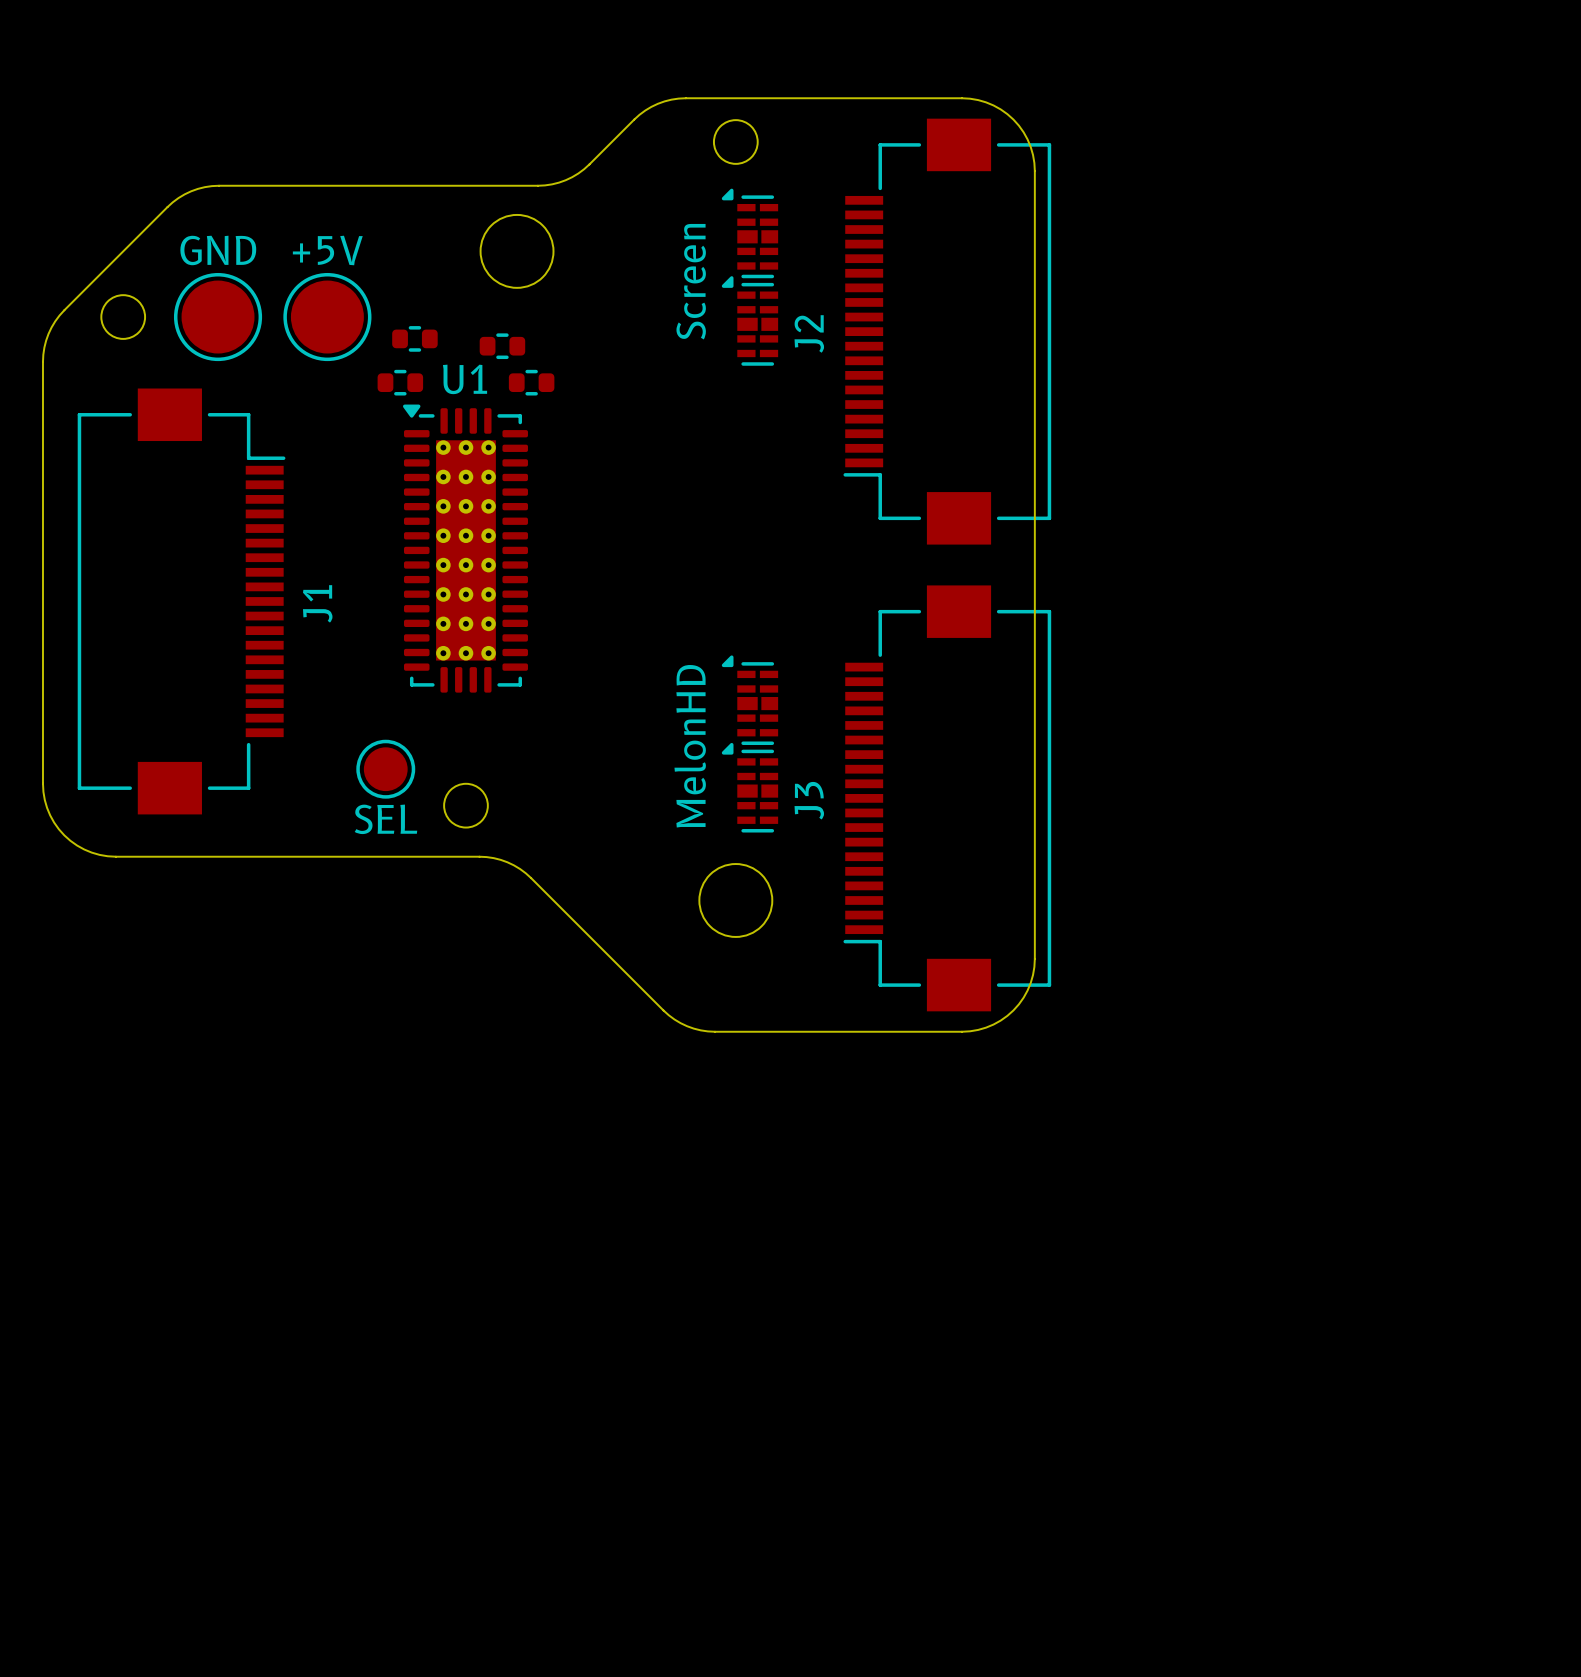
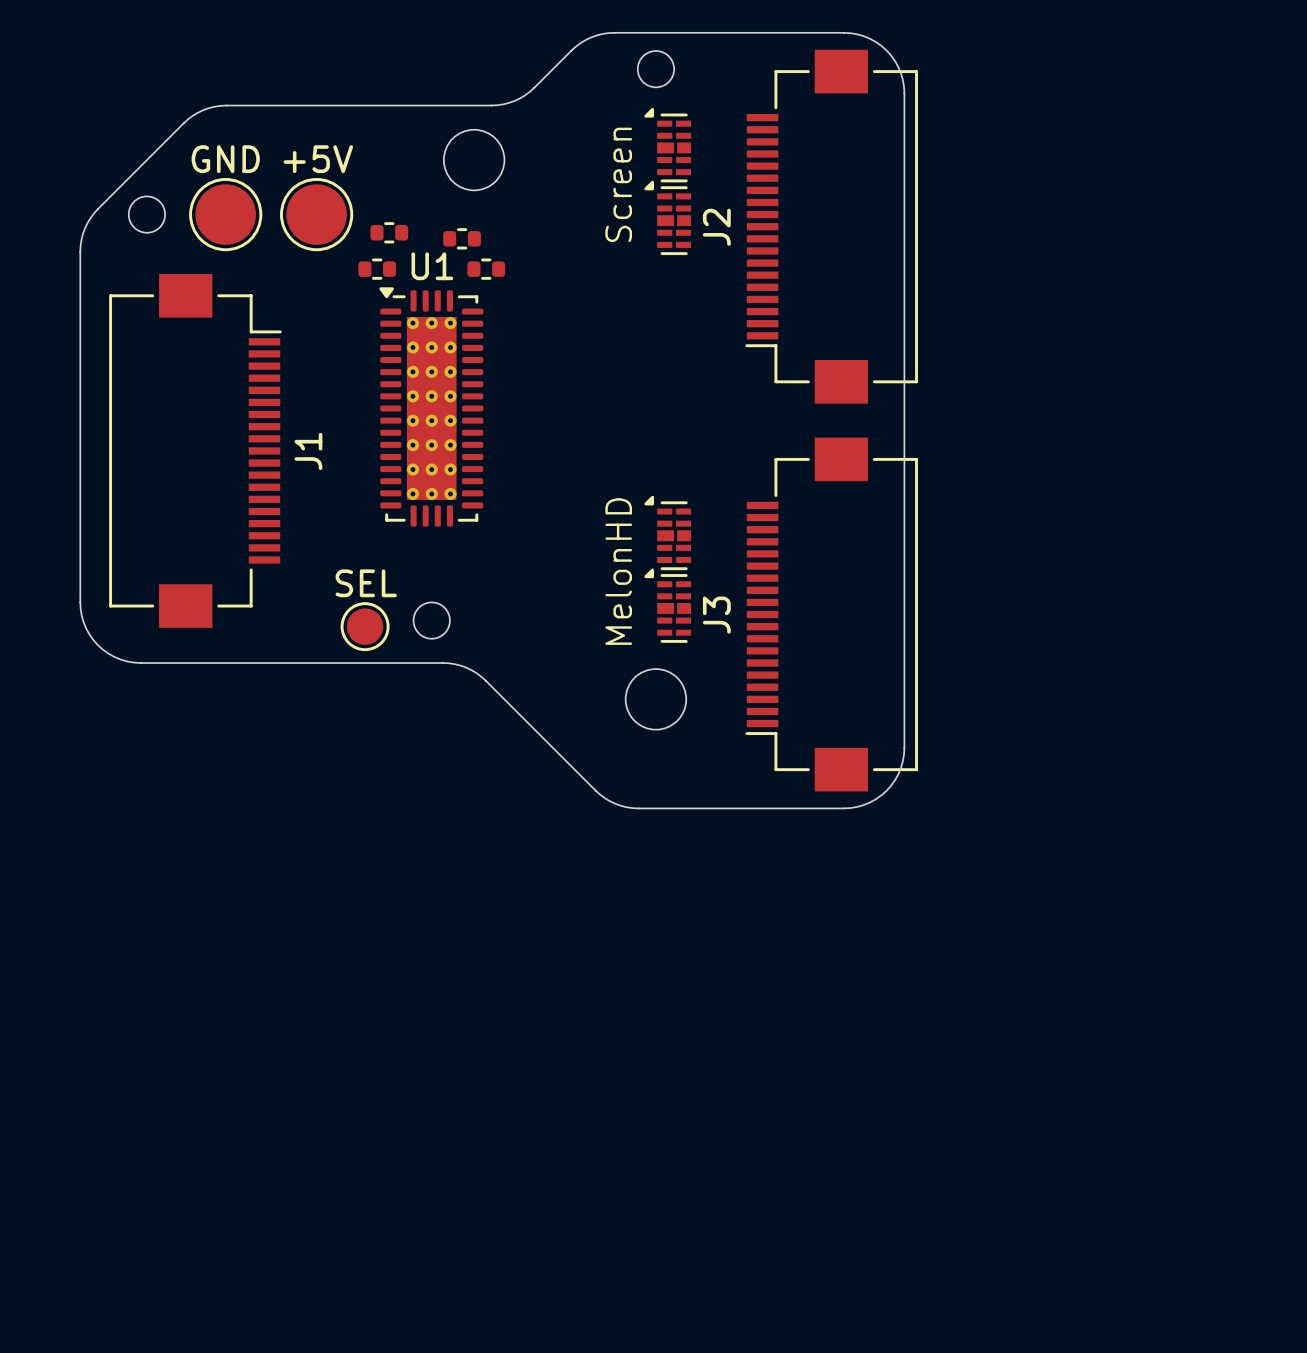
part position: (385, 769) -> (365, 626)
part value position: SEL (385, 819) -> SEL (366, 583)

